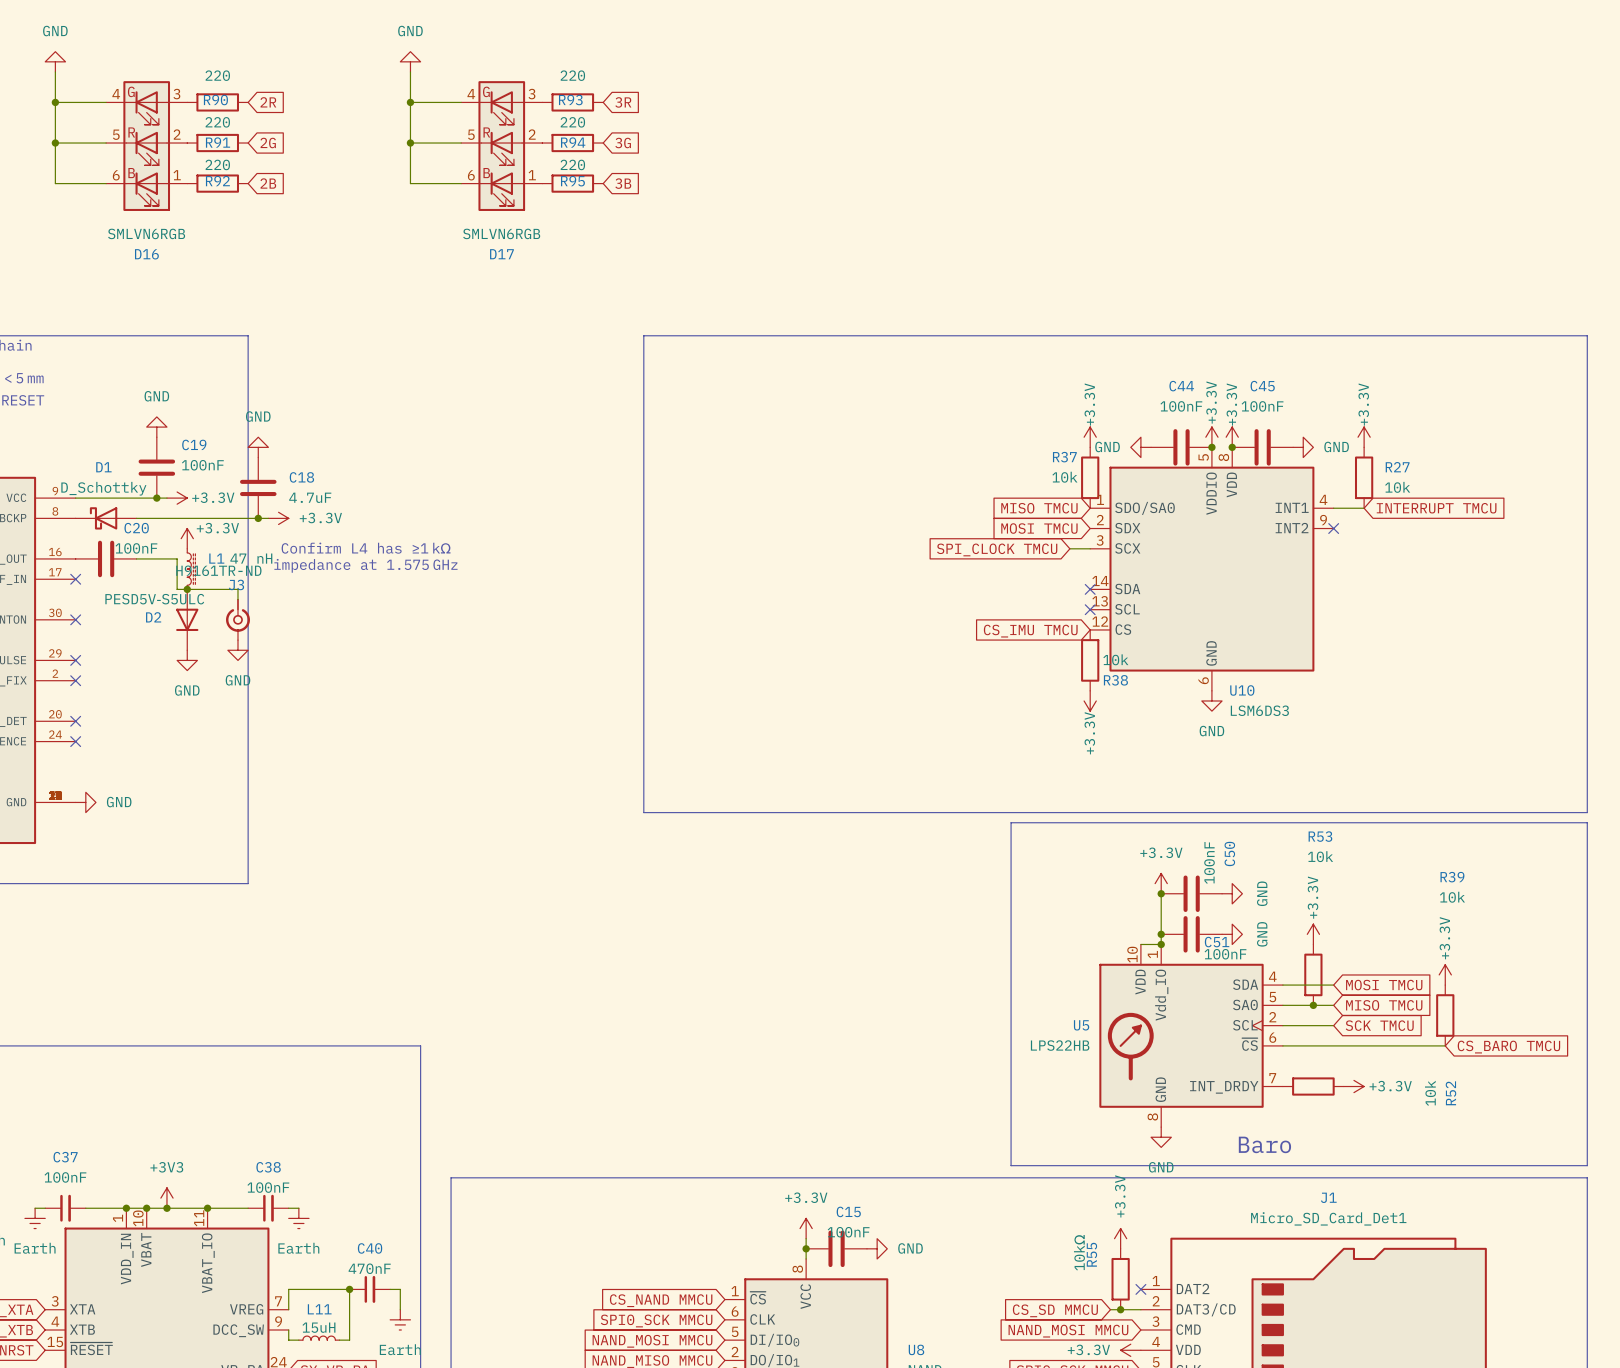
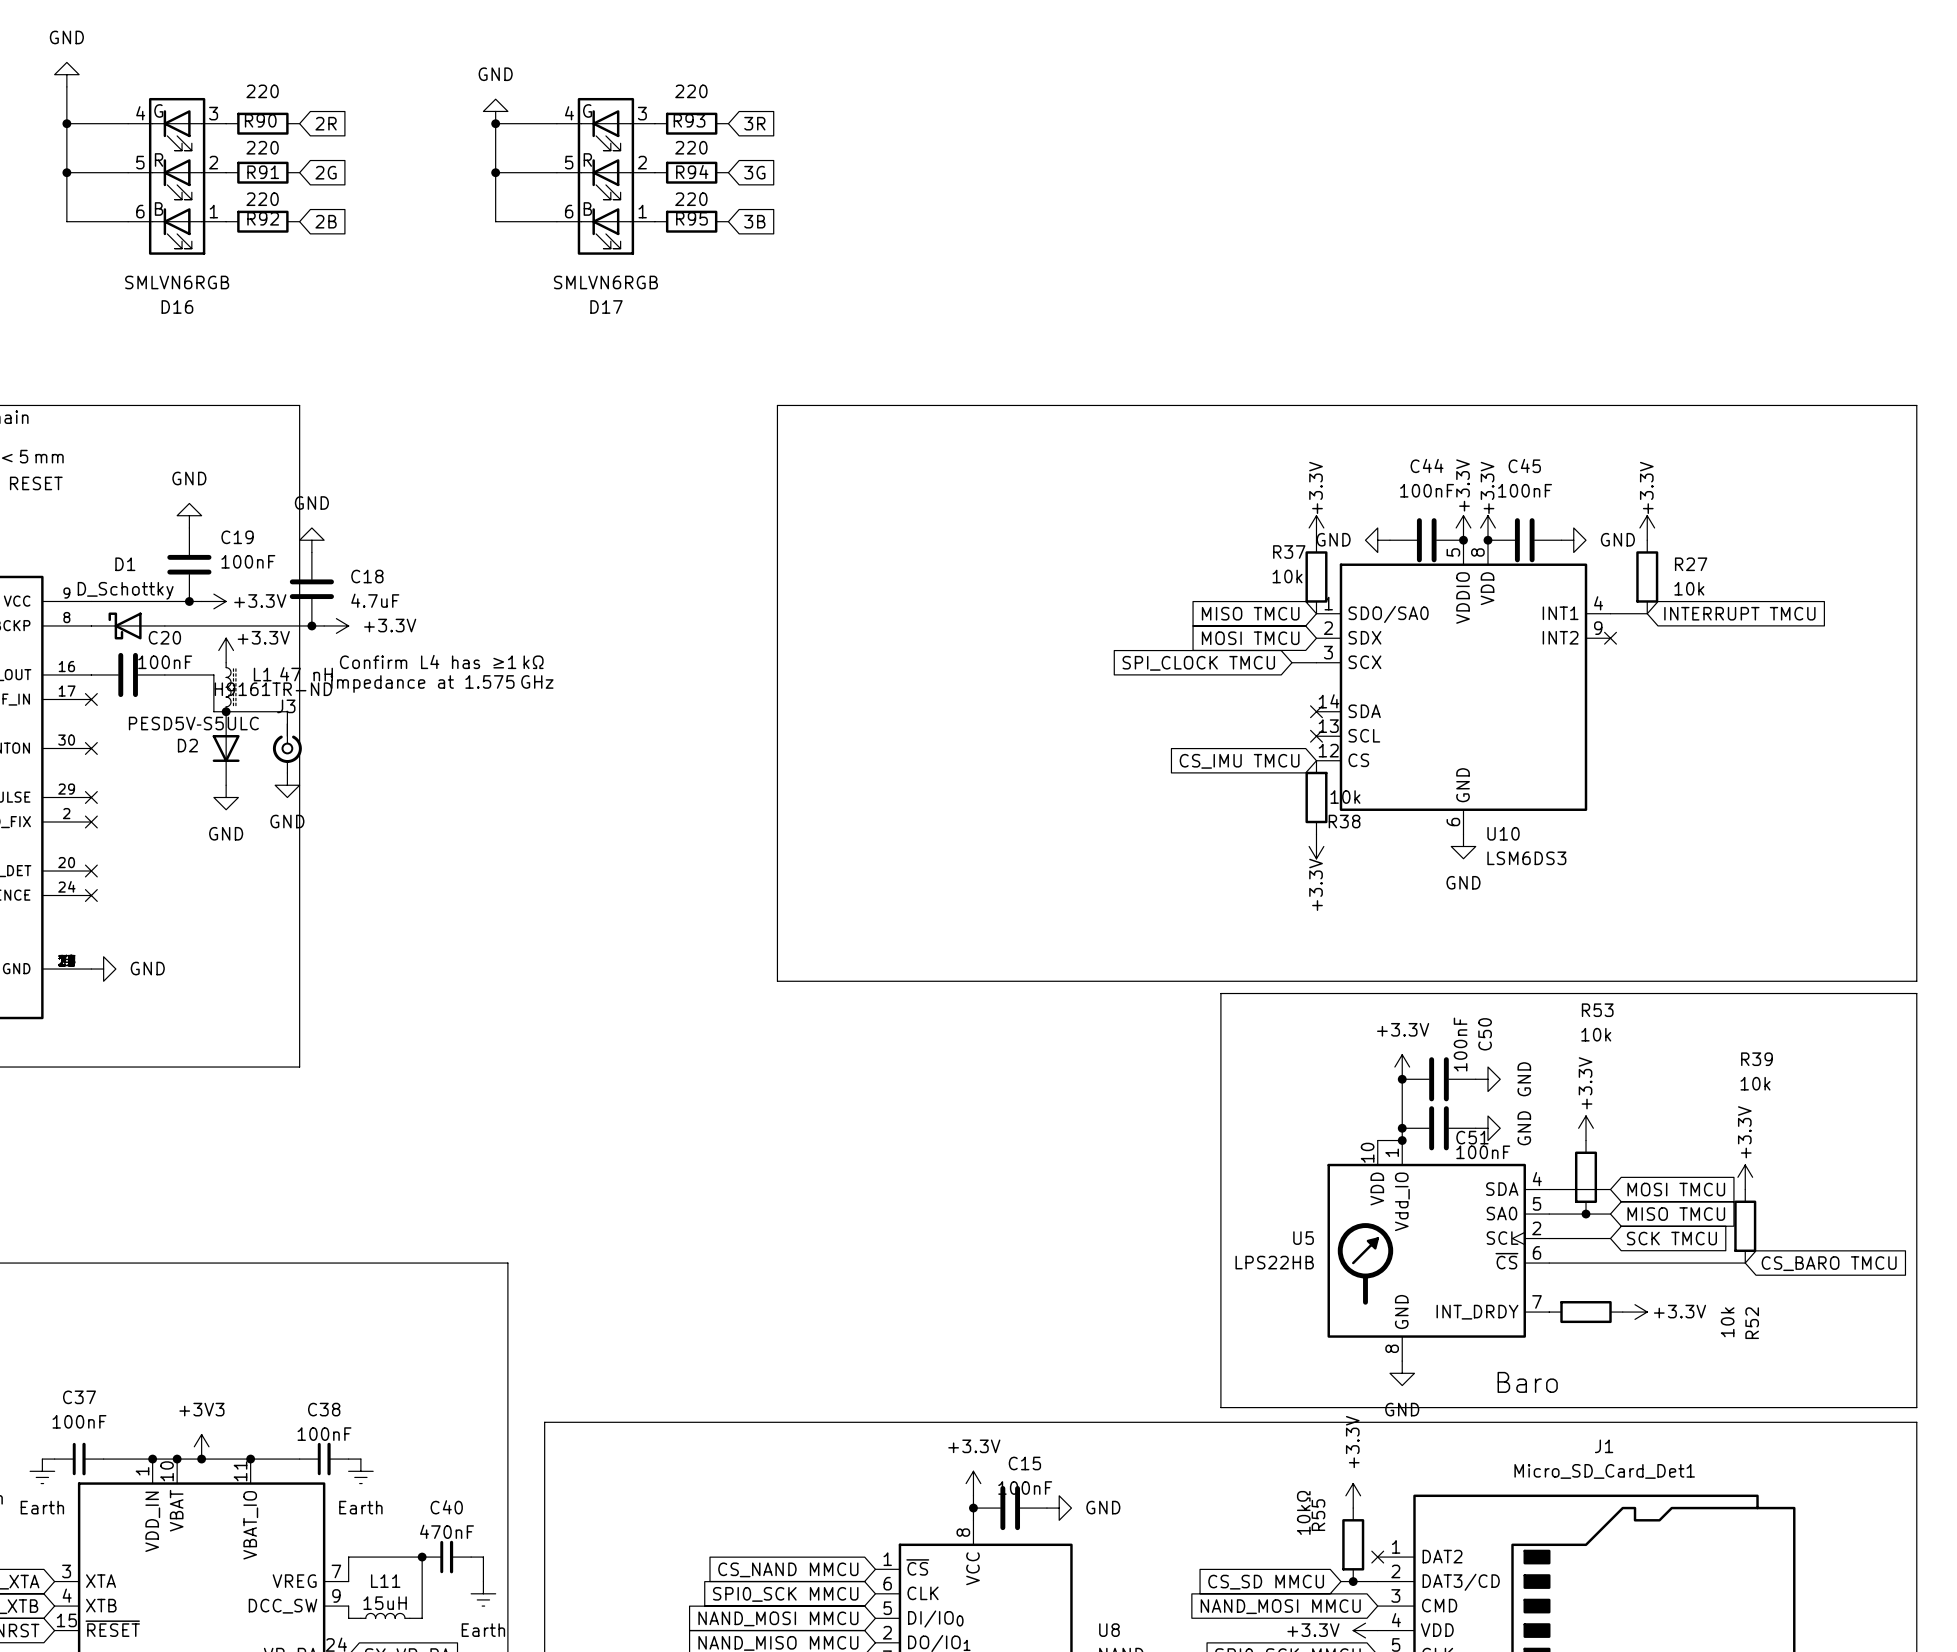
power symbol position: GND (410, 61) -> GND (495, 111)
wire: (410, 71) (410, 102) -> none

